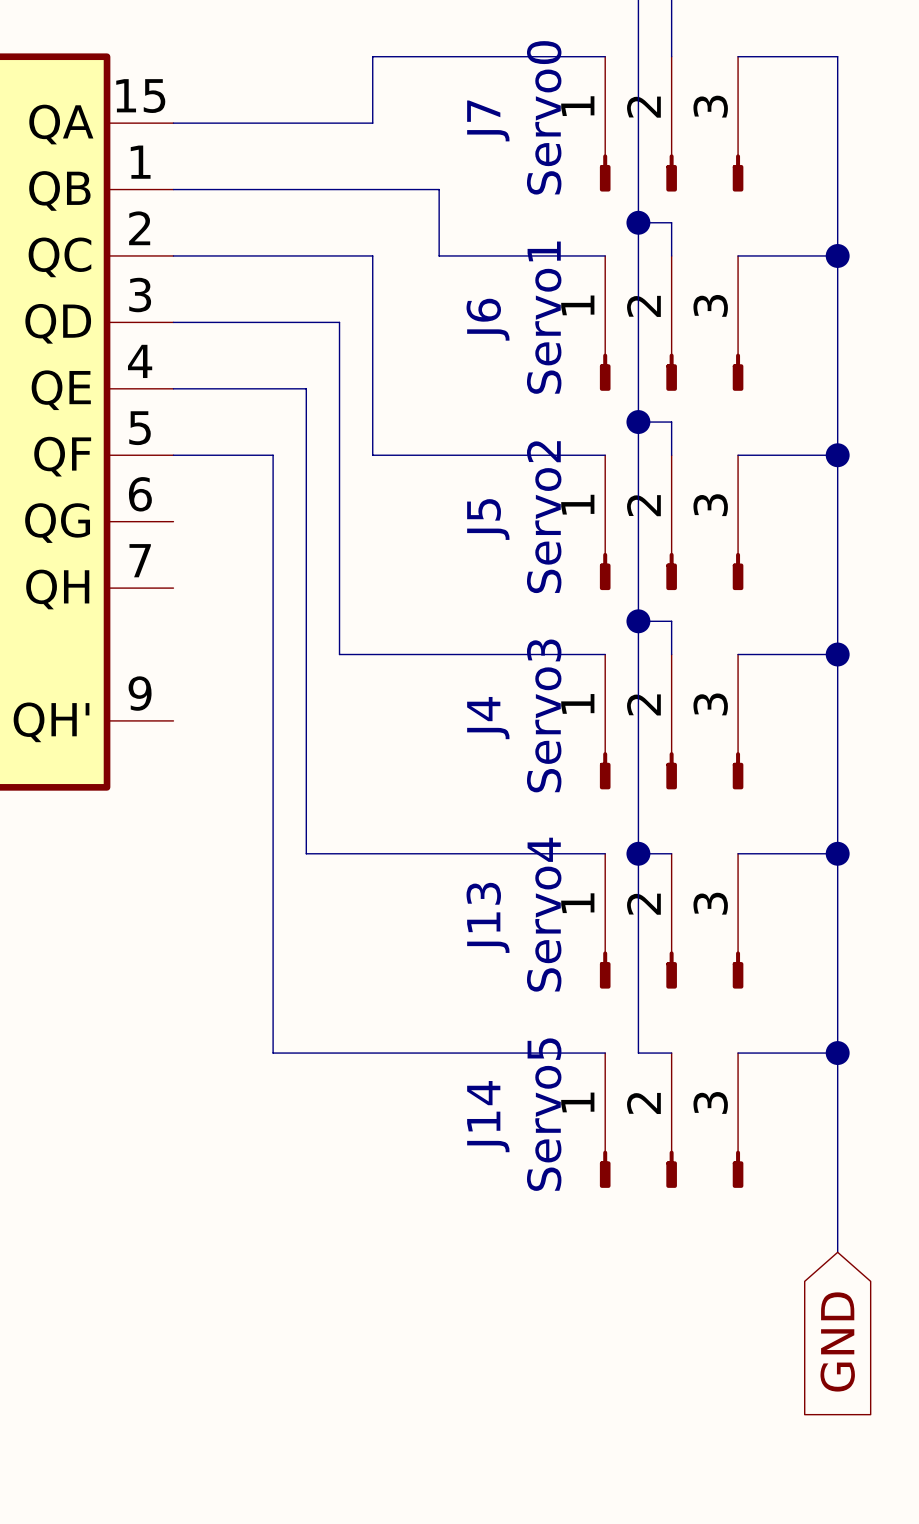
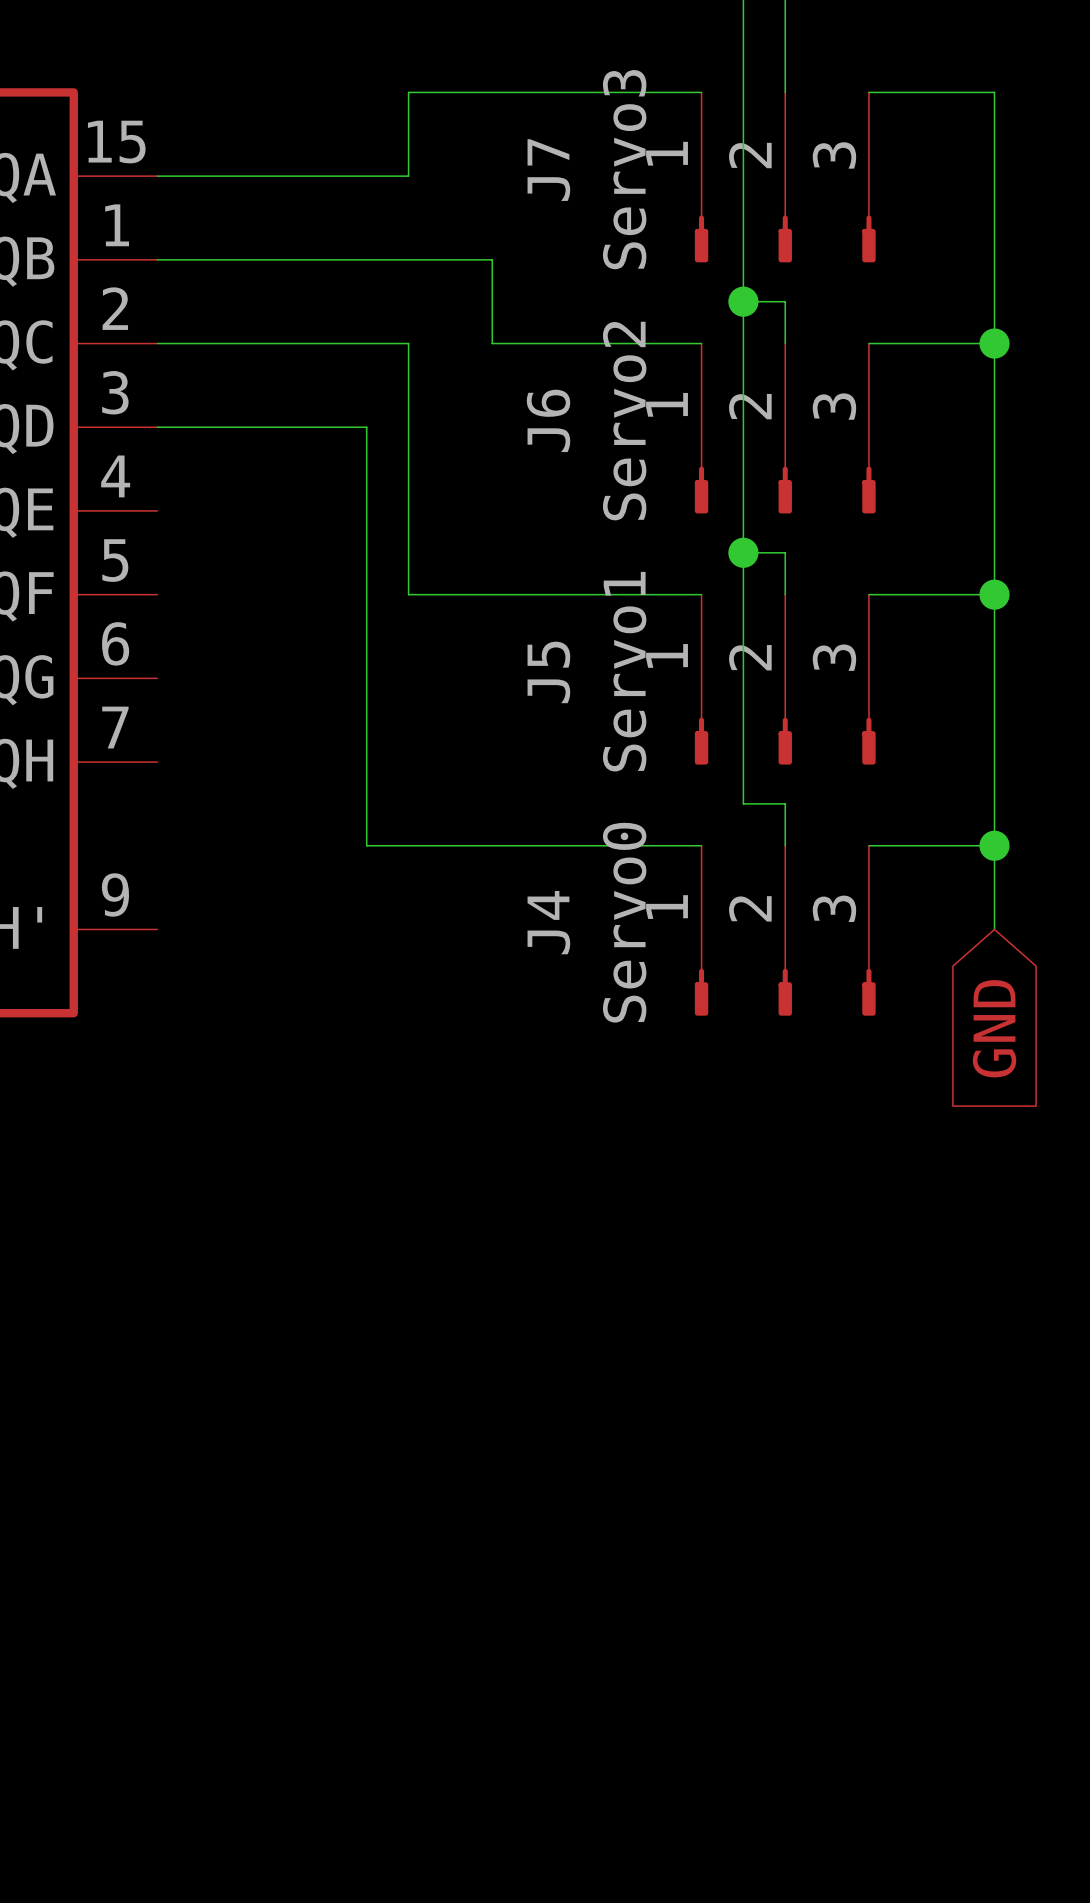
J7 value: Servo0 (544, 117) -> Servo3 (624, 169)
J6 value: Servo1 (544, 317) -> Servo2 (624, 421)
wire: (173, 388) (306, 388) (306, 853) (605, 853) -> none
wire: (173, 455) (273, 455) (273, 1053) (605, 1053) -> none
J5 value: Servo2 (544, 517) -> Servo1 (624, 671)
wire: (638, 621) (638, 1053) (671, 1053) -> none
junction: (638, 621) -> none
J4 value: Servo3 (544, 715) -> Servo0 (624, 922)
wire: (837, 720) (837, 1252) -> none
wire: (638, 853) (671, 853) -> none
junction: (638, 853) -> none
wire: (738, 853) (837, 853) -> none
junction: (837, 853) -> none
J13: Servo4 (671, 921) -> none
wire: (738, 1053) (837, 1053) -> none
junction: (837, 1053) -> none
J14: Servo5 (671, 1120) -> none
global label position: GND (837, 1341) -> GND (994, 1028)

